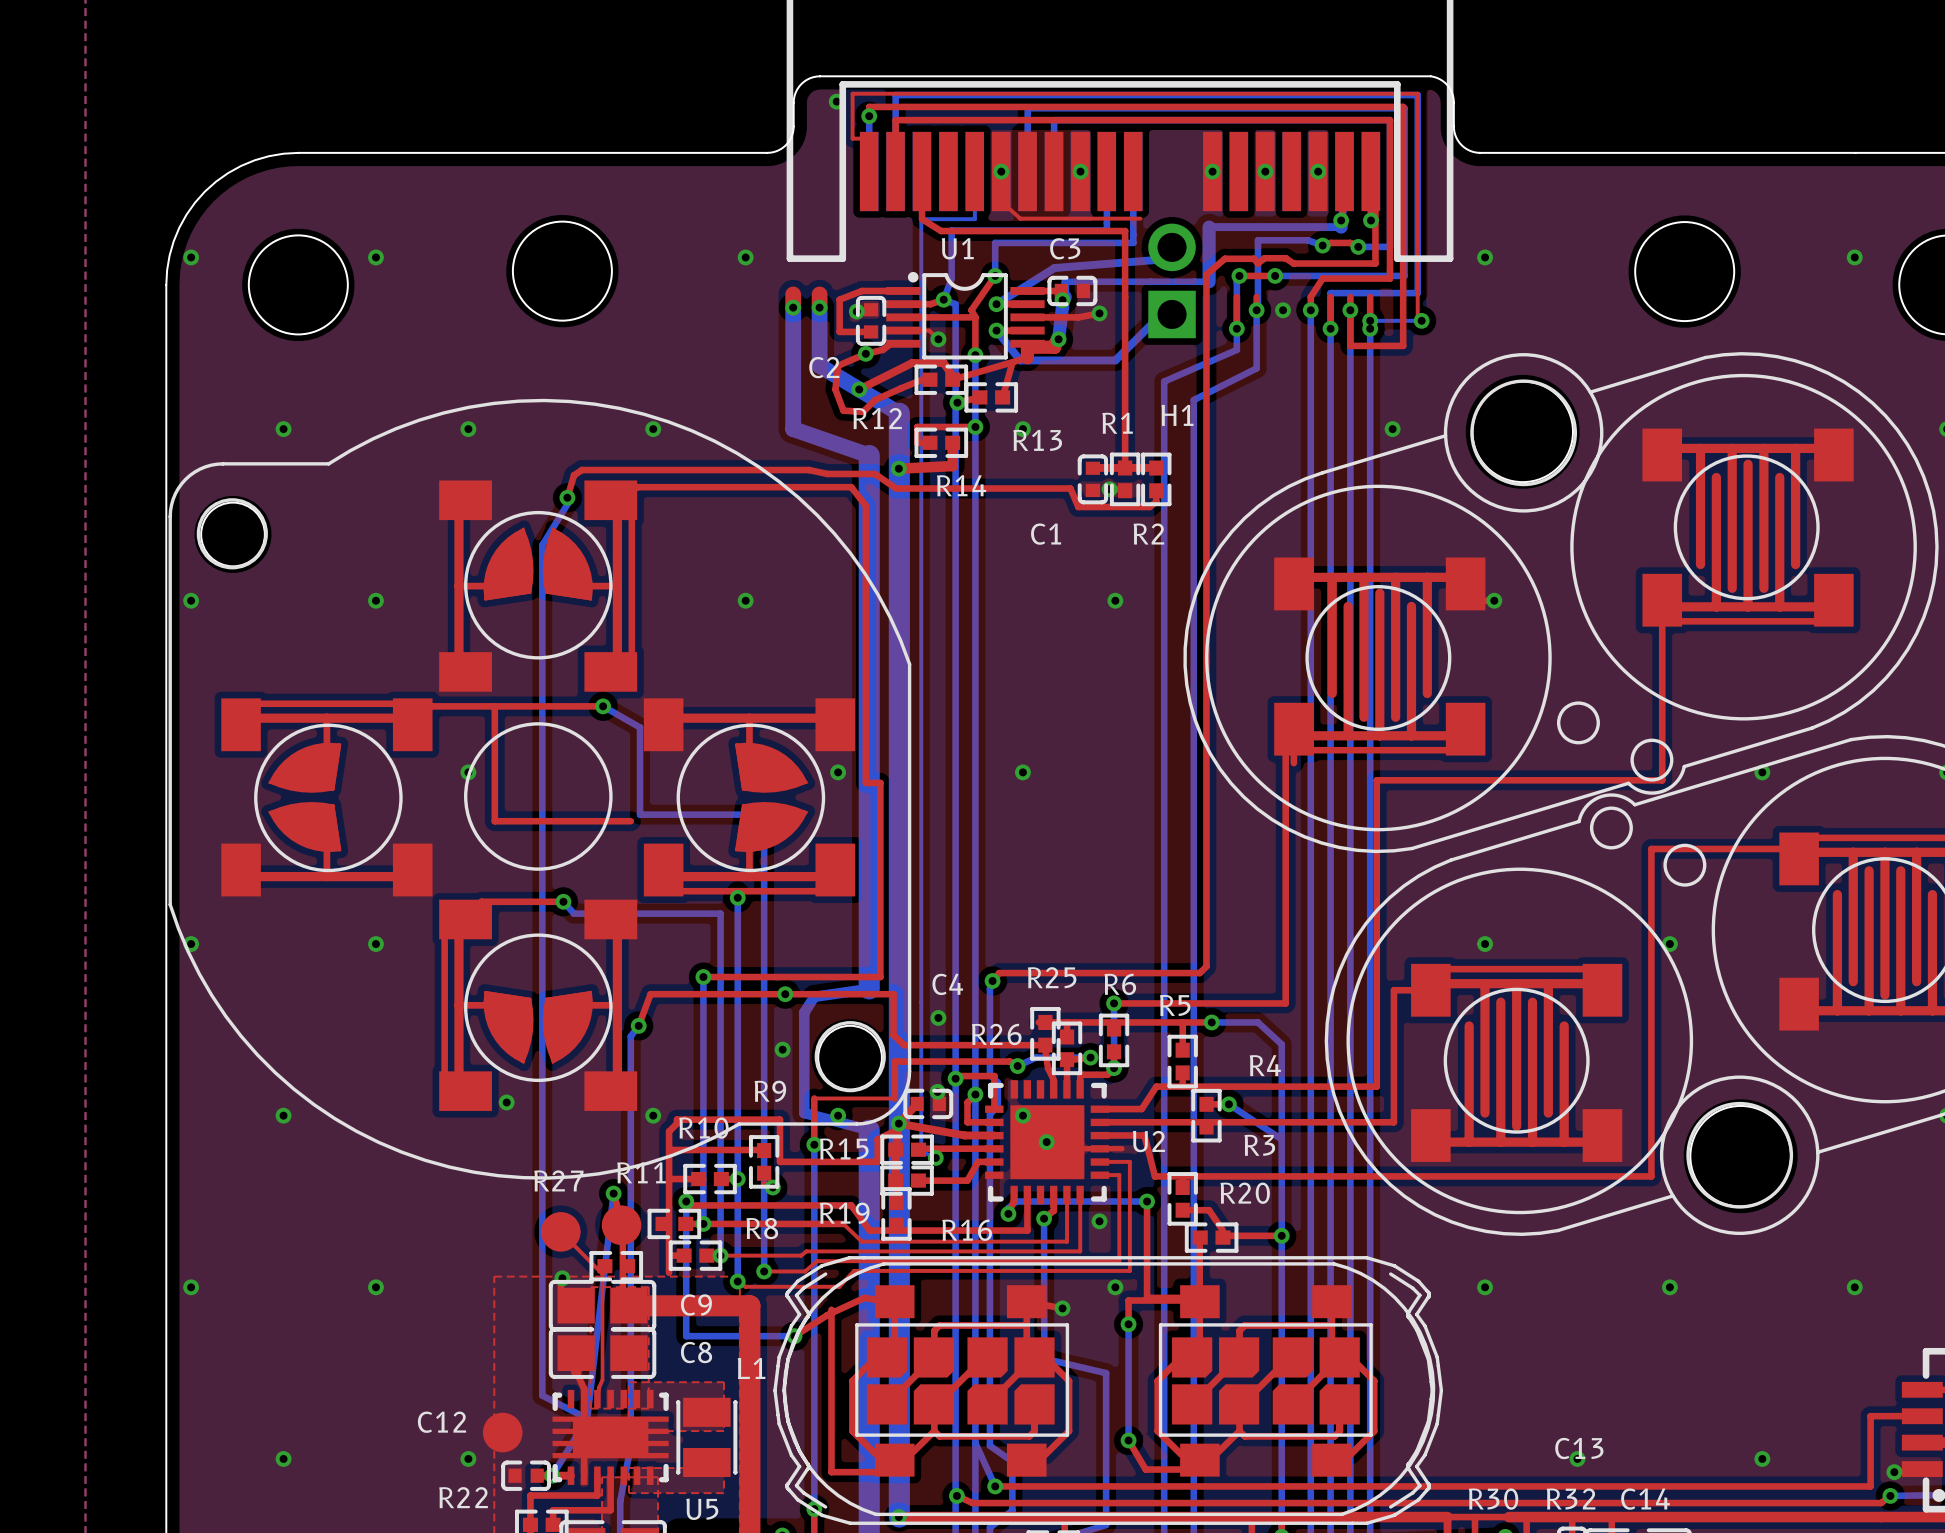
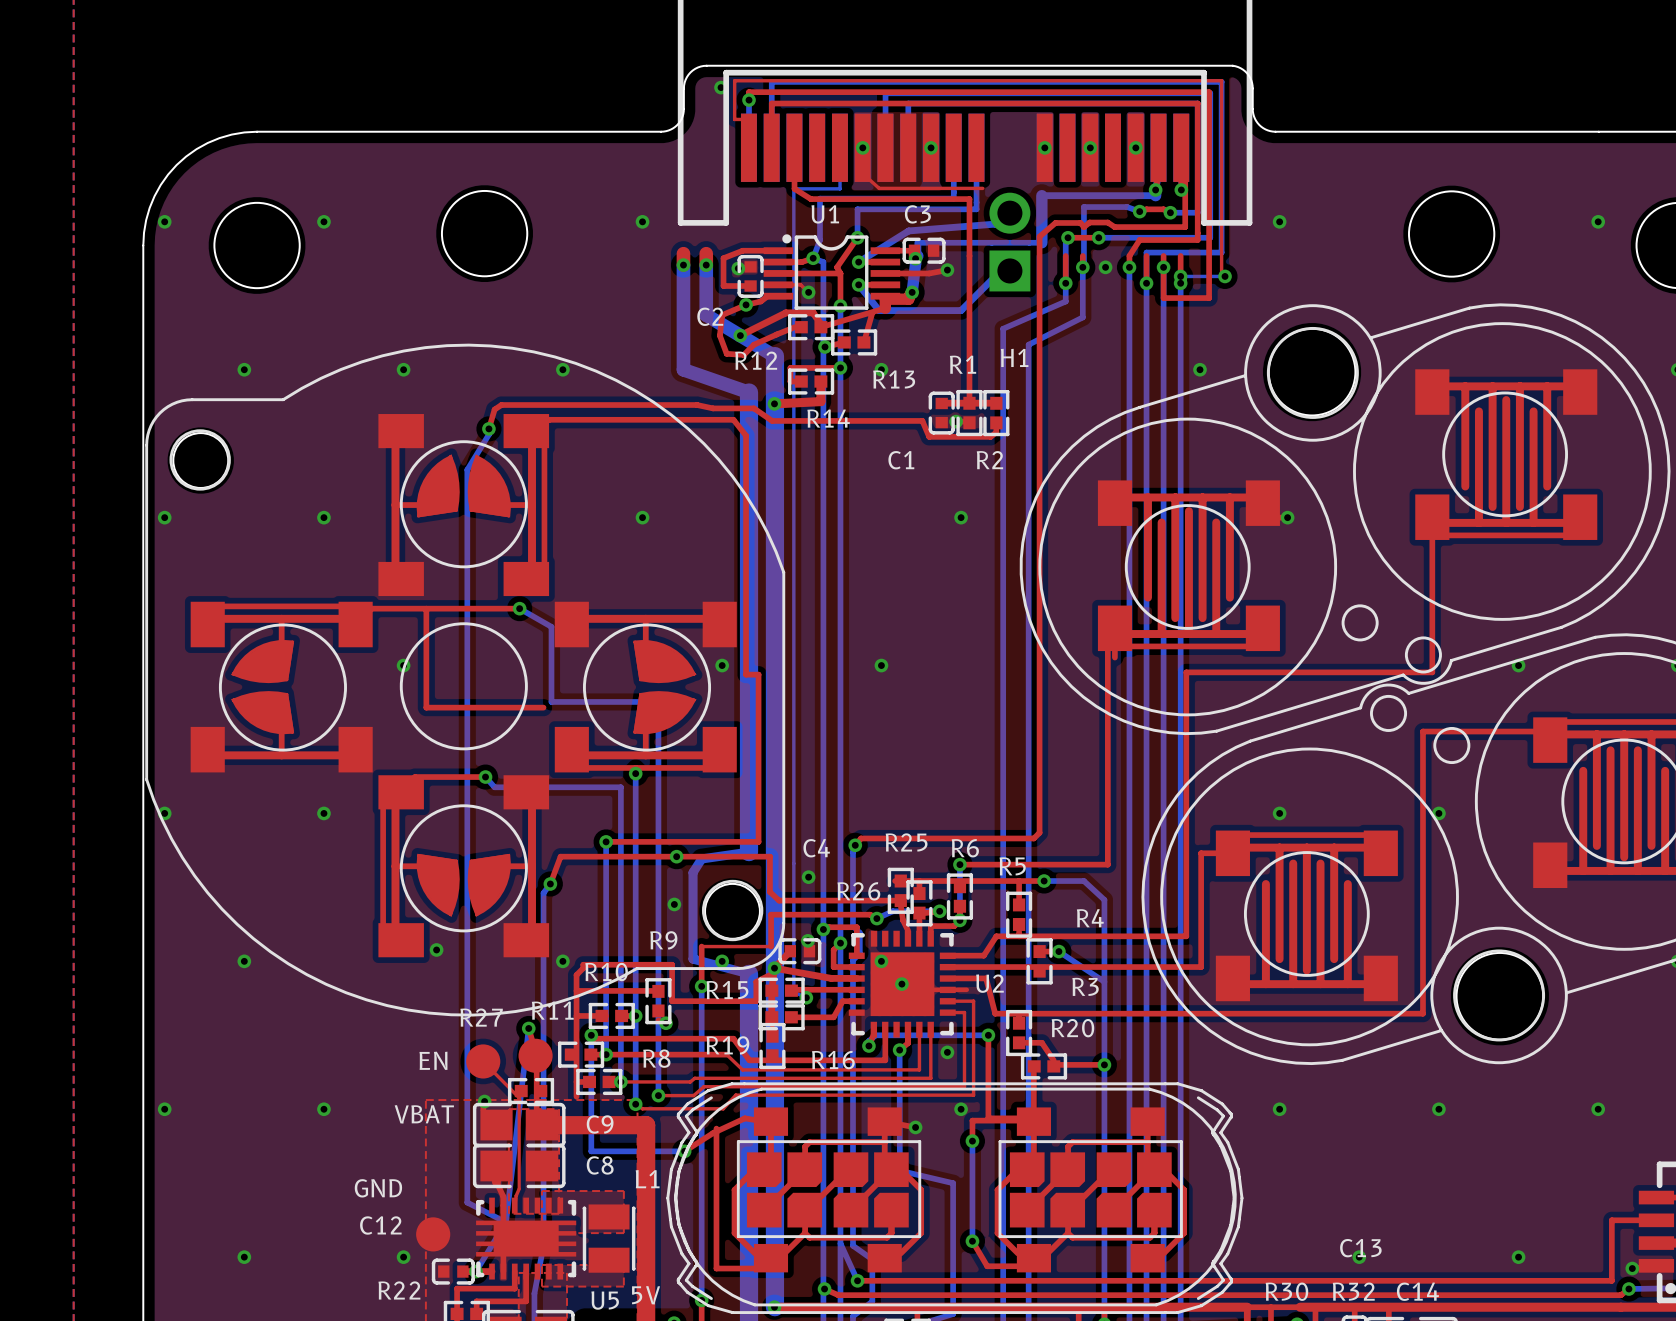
text: none -> EN (433, 1060)
text: none -> VBAT (424, 1114)
text: none -> GND (378, 1188)
text: none -> 5V (646, 1295)

